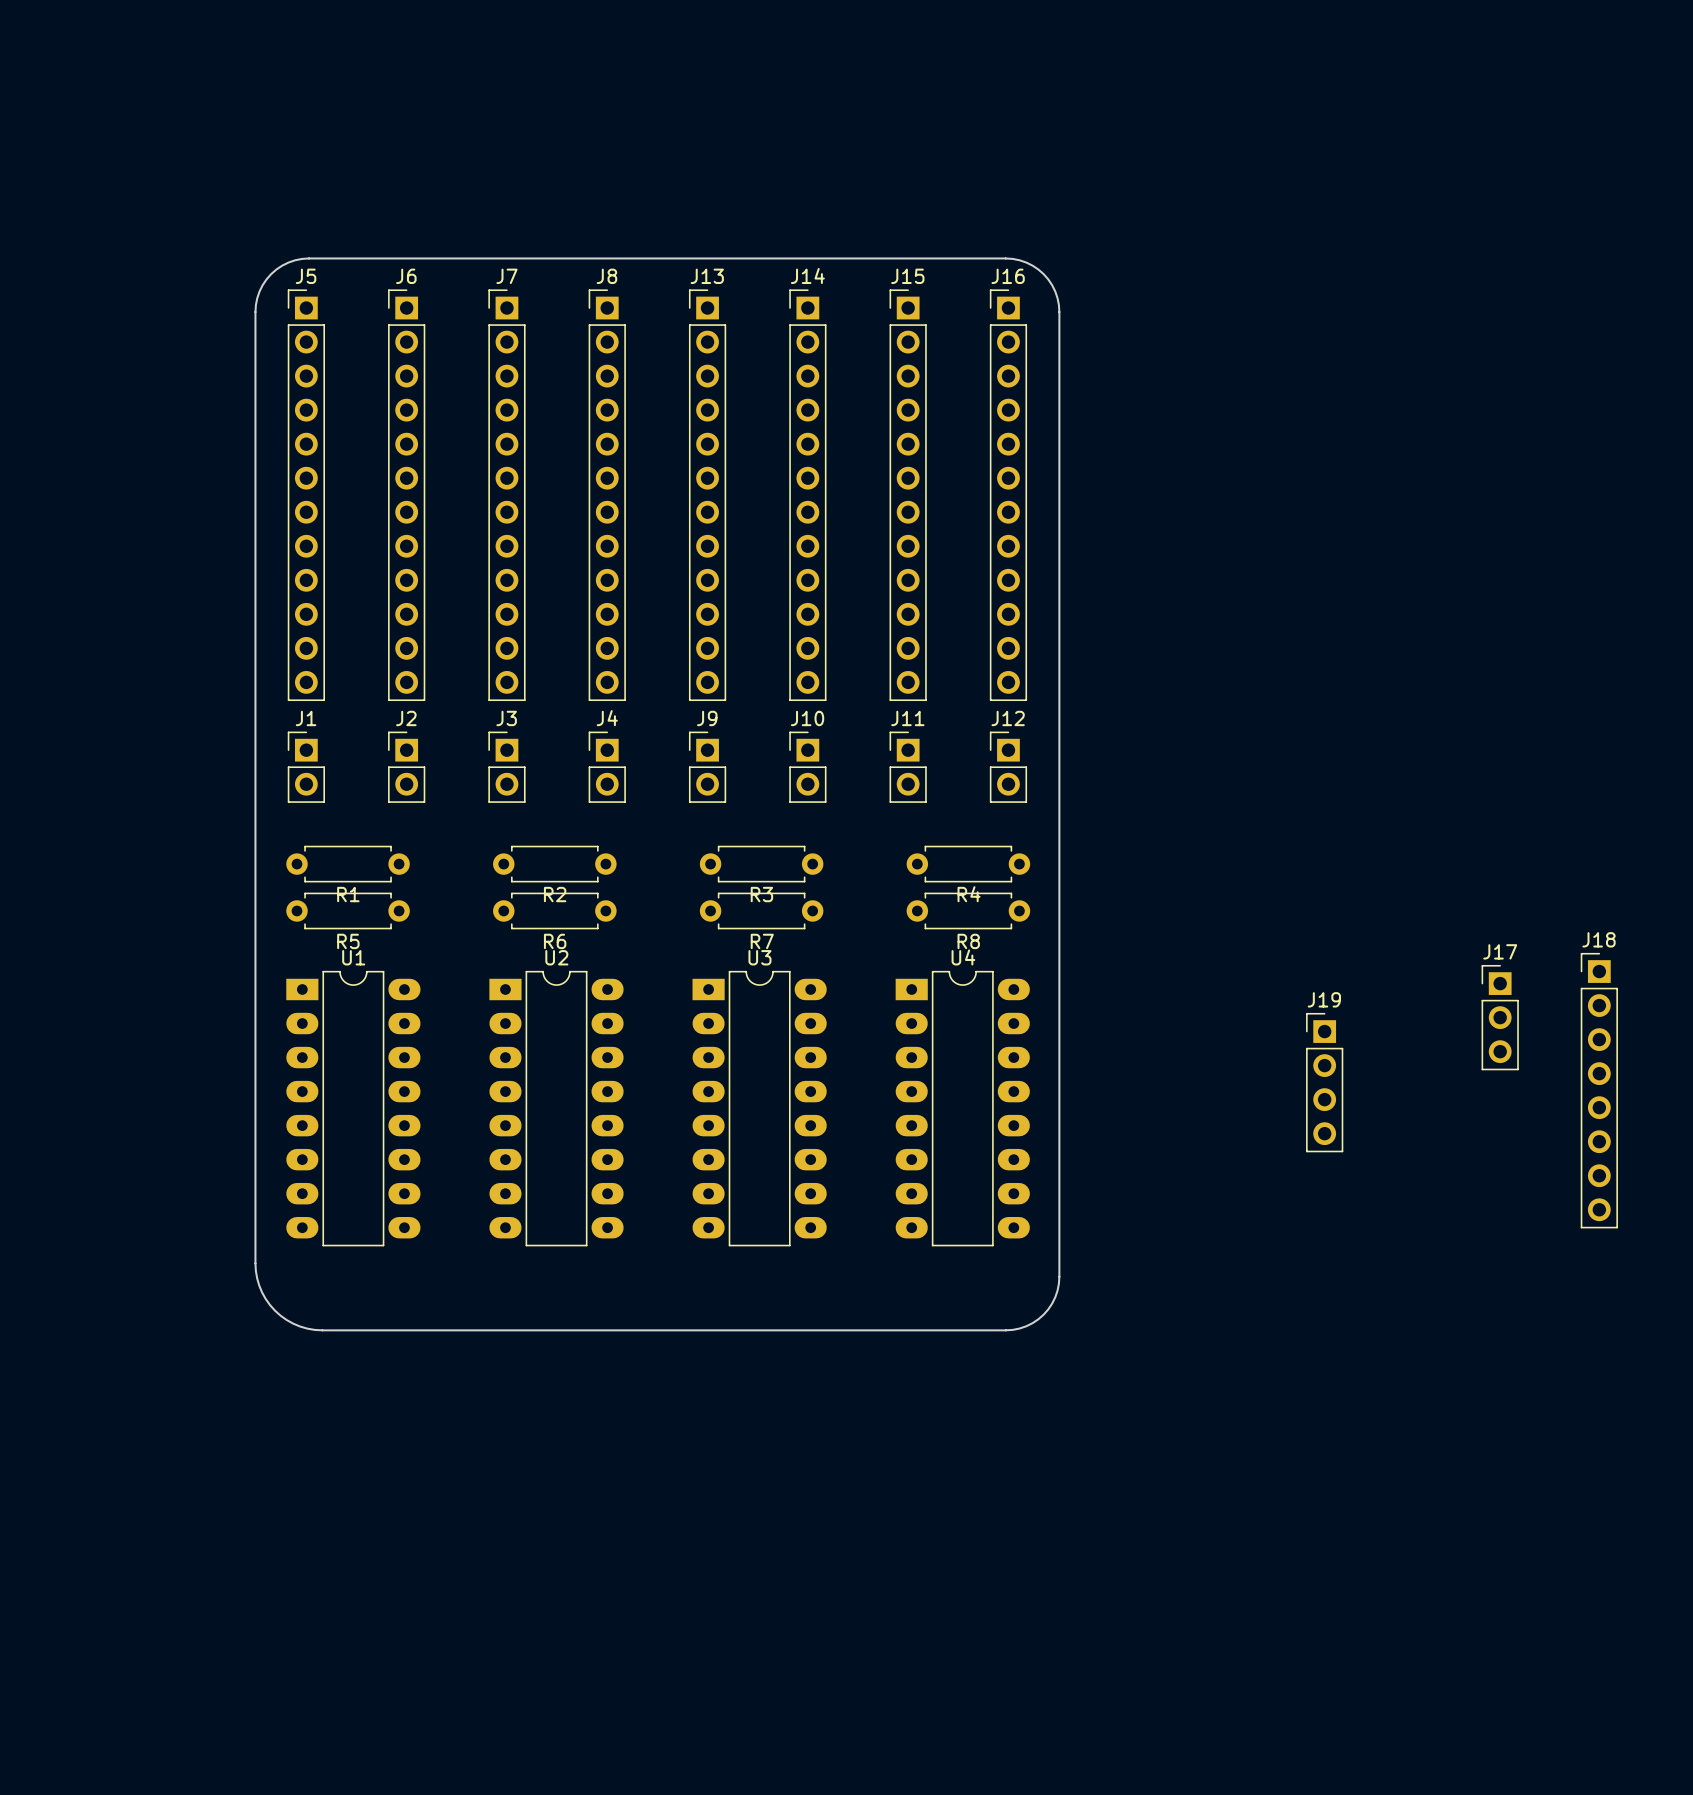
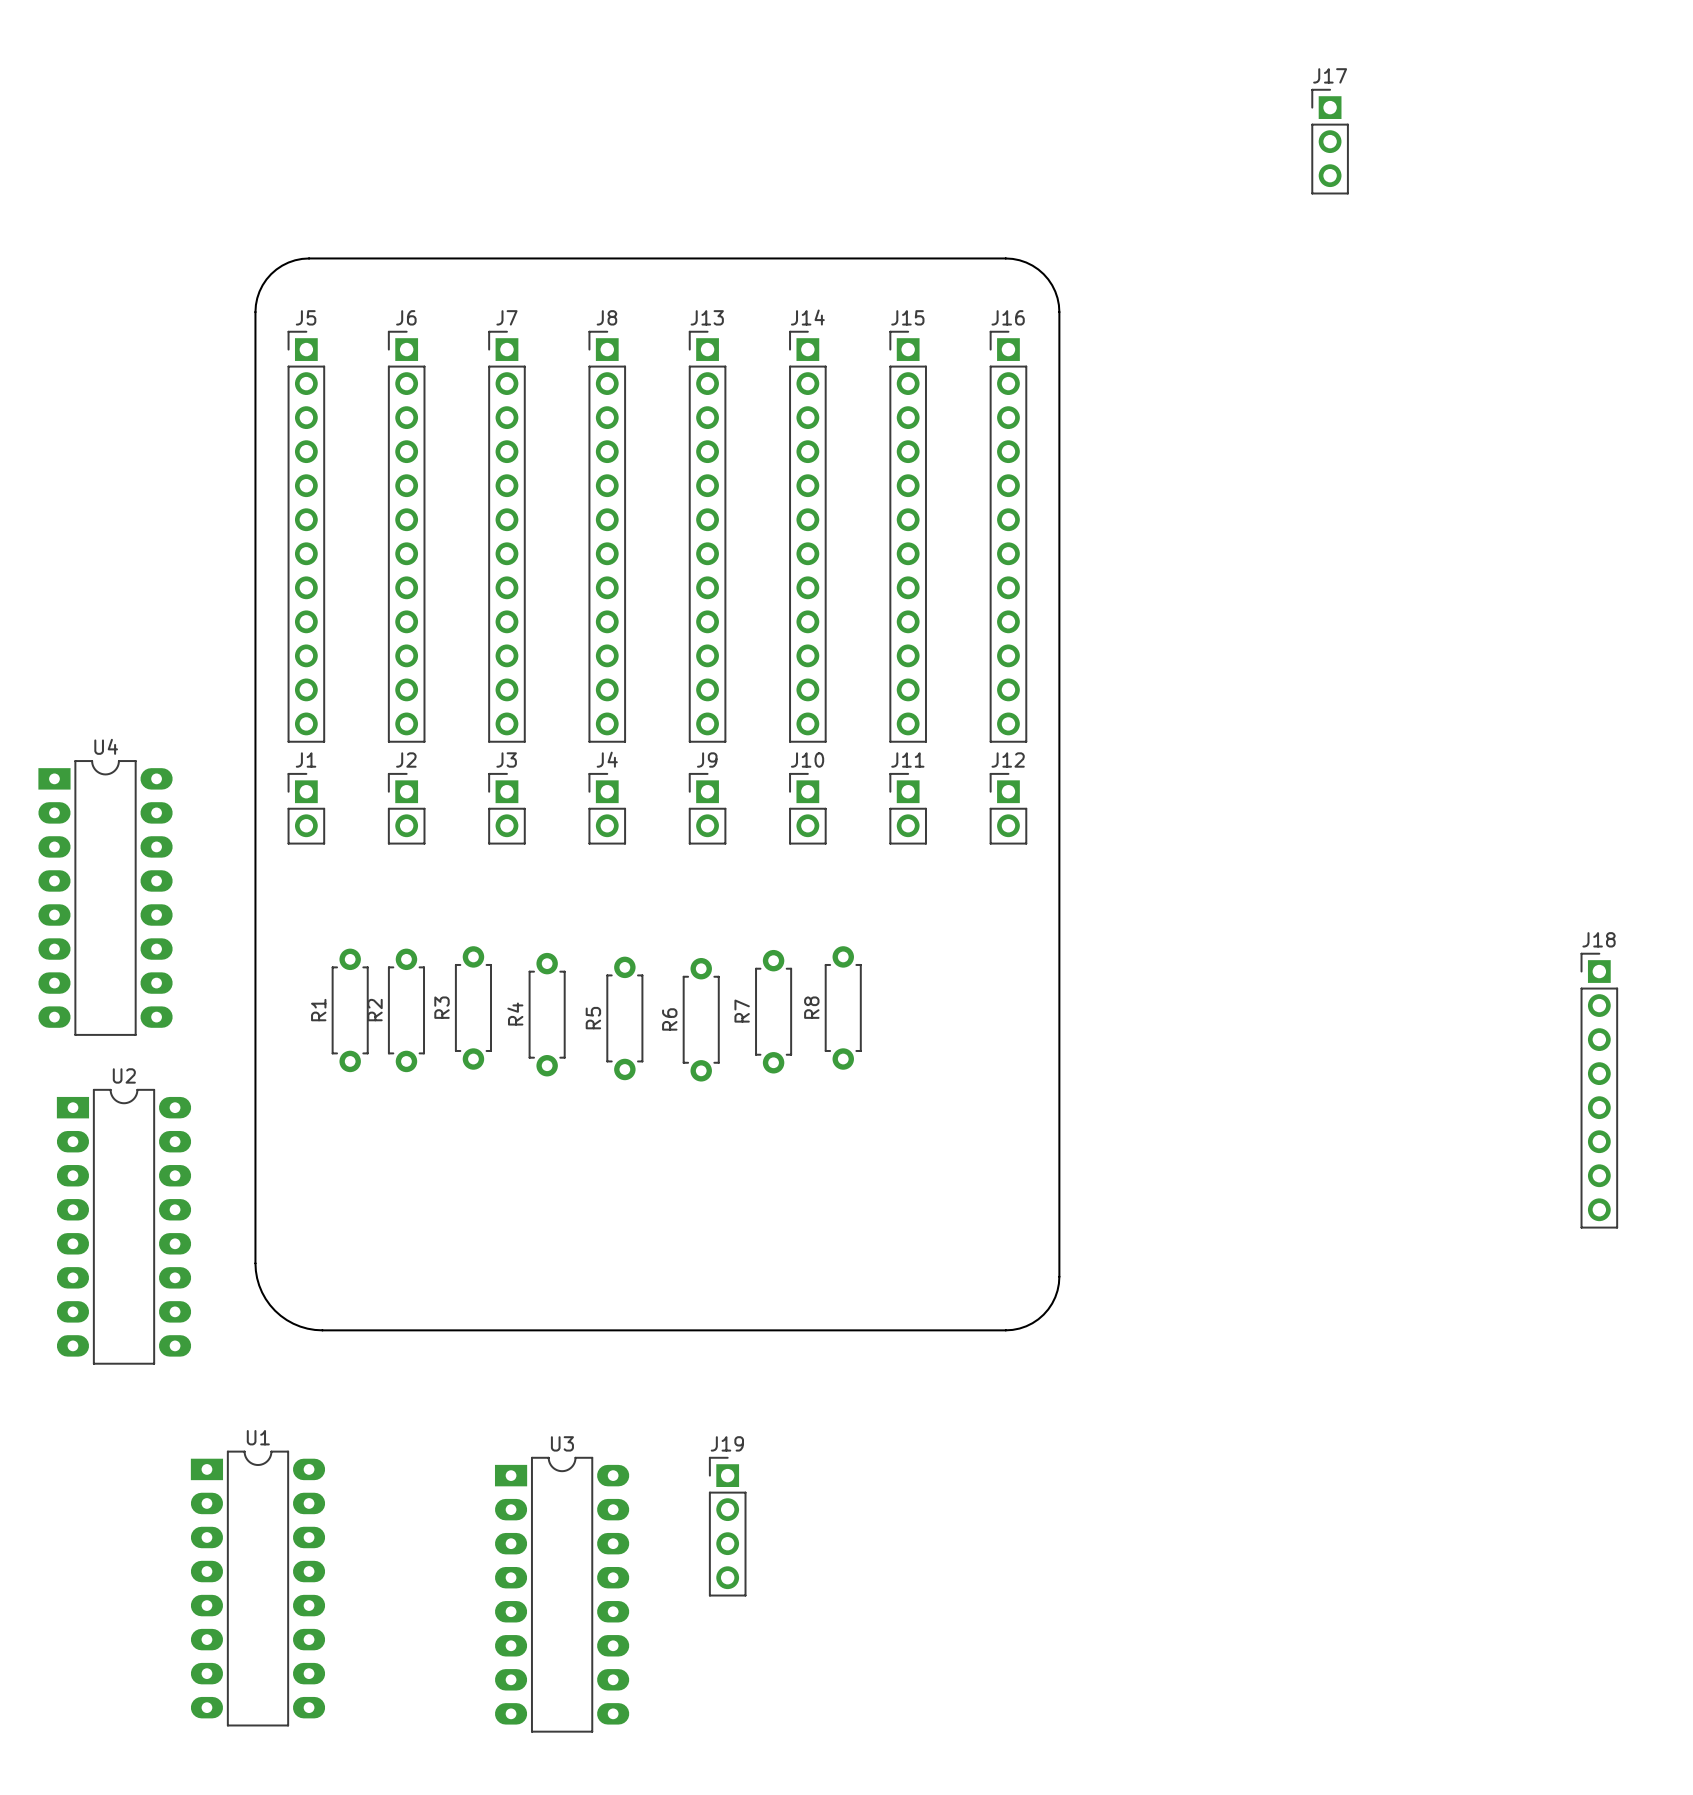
J5 position: (306, 495) -> (306, 536)
J6 position: (406, 495) -> (406, 536)
J7 position: (506, 495) -> (506, 536)
J8 position: (607, 495) -> (607, 536)
J13 position: (707, 495) -> (707, 536)
J14 position: (807, 495) -> (807, 536)
J15 position: (908, 495) -> (908, 536)
J16 position: (1008, 495) -> (1008, 536)
J1 position: (306, 767) -> (306, 808)
J2 position: (406, 767) -> (406, 808)
J3 position: (506, 767) -> (506, 808)
J4 position: (607, 767) -> (607, 808)
J9 position: (707, 767) -> (707, 808)
J10 position: (807, 767) -> (807, 808)
J11 position: (908, 767) -> (908, 808)
J12 position: (1008, 767) -> (1008, 808)
R1 rotation: 0° (348, 864) -> 90° clockwise (350, 1010)
R1 position: (348, 864) -> (350, 1010)
R2 rotation: 0° (554, 864) -> 90° clockwise (406, 1010)
R2 position: (554, 864) -> (406, 1010)
R3 rotation: 0° (761, 864) -> 90° clockwise (473, 1007)
R3 position: (761, 864) -> (473, 1007)
R4 rotation: 0° (968, 864) -> 90° clockwise (547, 1014)
R4 position: (968, 864) -> (547, 1014)
R5 rotation: 0° (348, 910) -> 90° clockwise (624, 1018)
R5 position: (348, 910) -> (624, 1018)
R6 rotation: 0° (554, 910) -> 90° clockwise (701, 1019)
R6 position: (554, 910) -> (701, 1019)
R7 rotation: 0° (761, 910) -> 90° clockwise (773, 1011)
R7 position: (761, 910) -> (773, 1011)
R8 rotation: 0° (968, 910) -> 90° clockwise (843, 1007)
R8 position: (968, 910) -> (843, 1007)
J17 position: (1500, 1017) -> (1330, 141)
J19 position: (1324, 1082) -> (727, 1526)
U1 position: (353, 1108) -> (258, 1588)
U2 position: (556, 1108) -> (124, 1226)
U3 position: (759, 1108) -> (562, 1594)
U4 position: (962, 1108) -> (105, 897)

